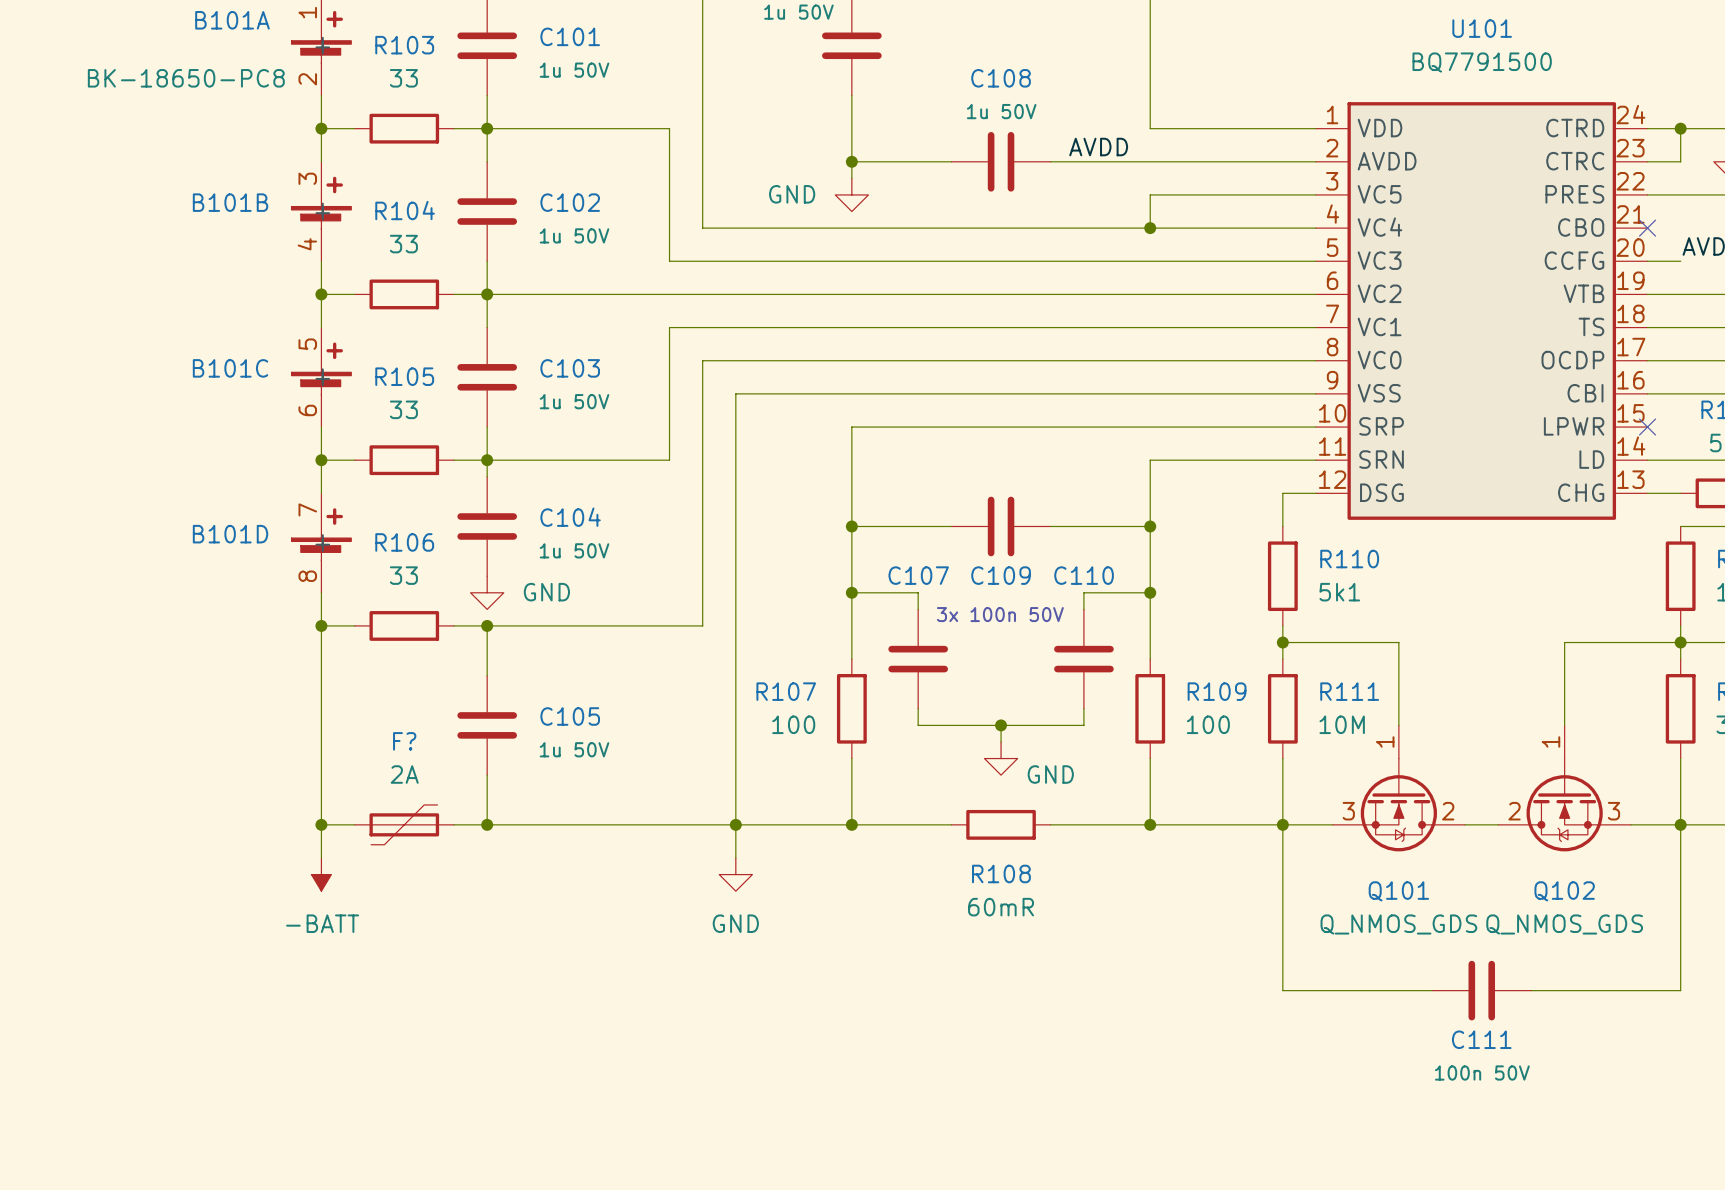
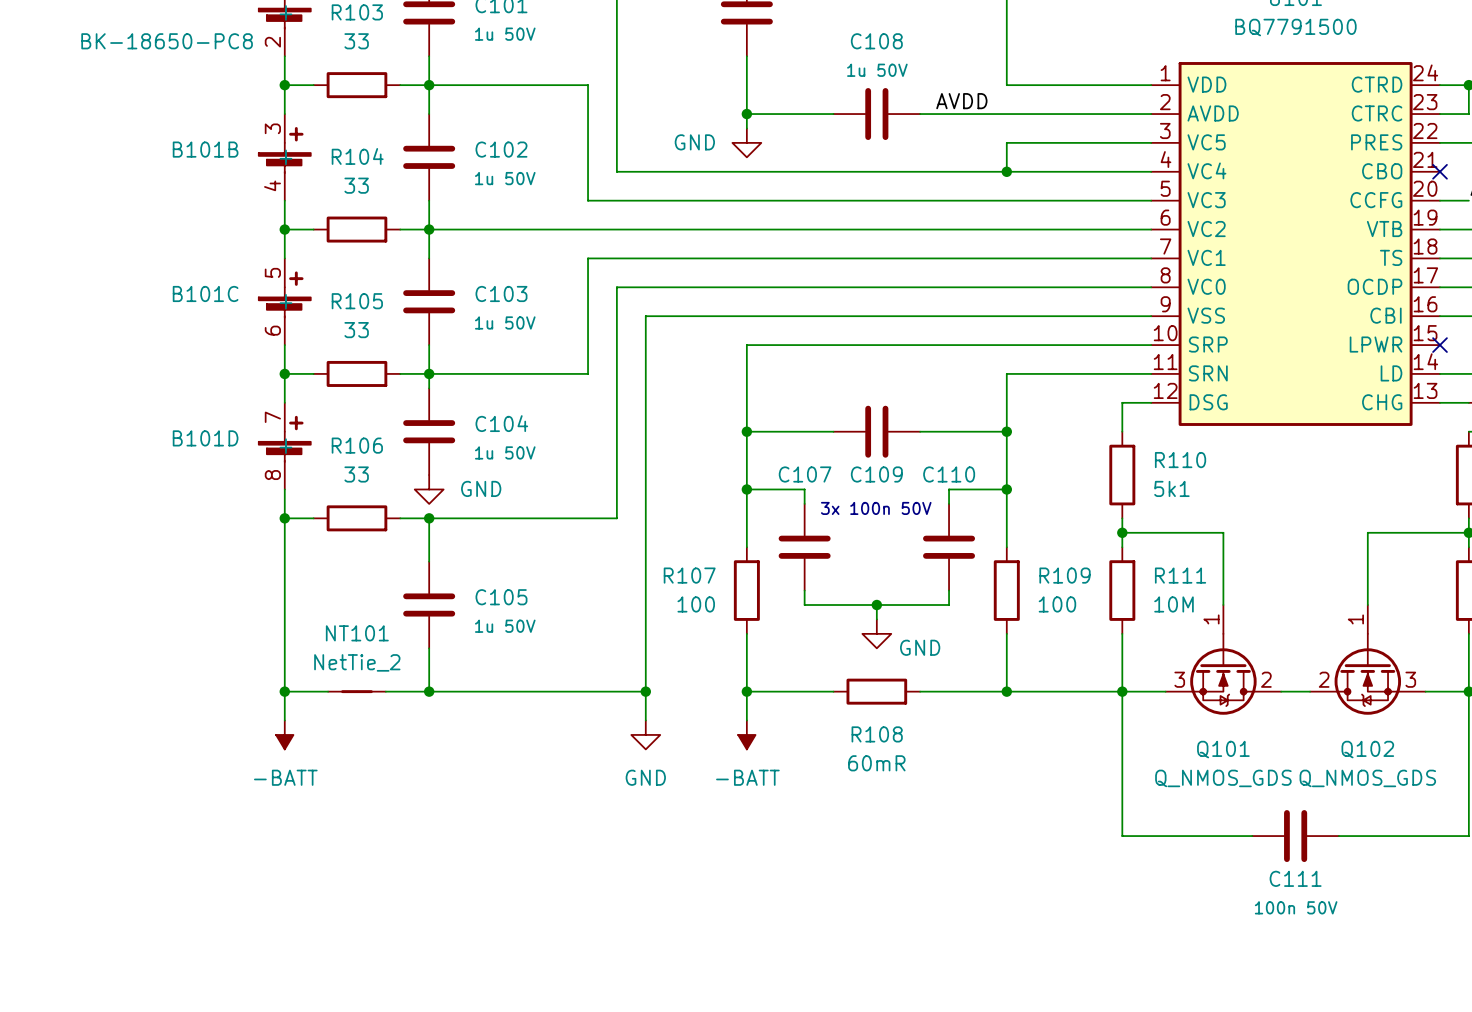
F?: 2A (404, 824) -> none
NT101: none -> NetTie_2 (356, 691)
wire: (735, 824) (851, 824) -> (746, 720) (746, 691)
power symbol: none -> -BATT (746, 734)

